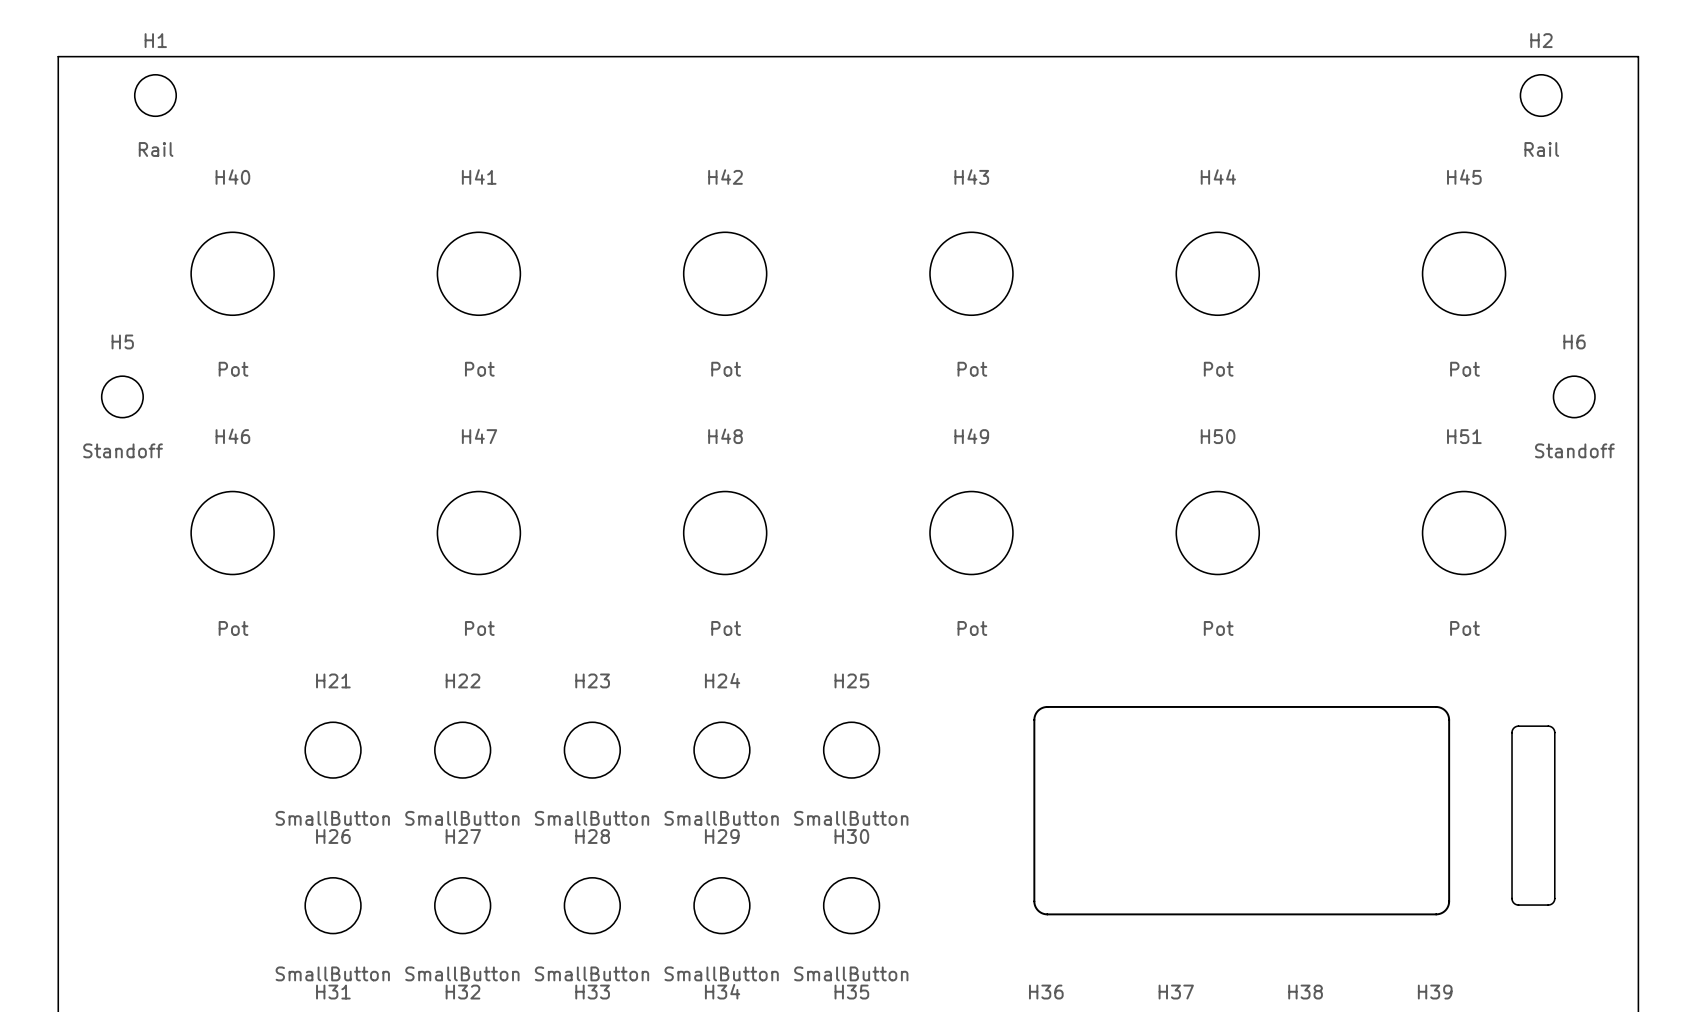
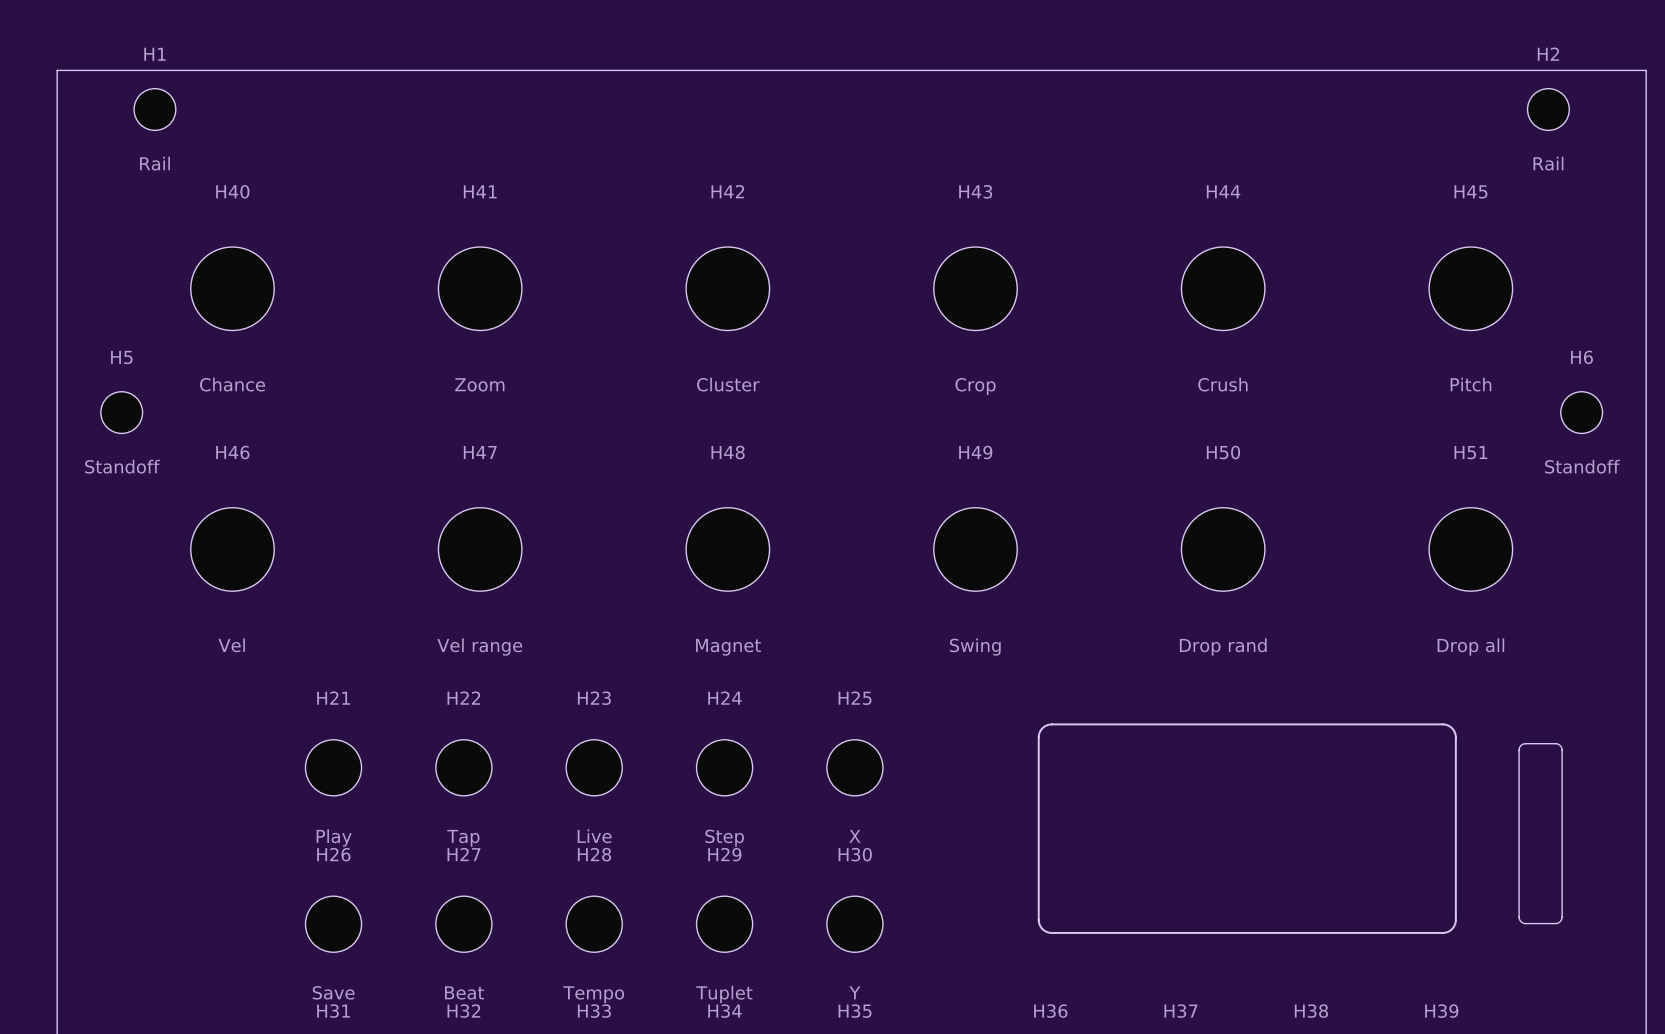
H40 value: Pot (233, 369) -> Chance (232, 384)
H41 value: Pot (479, 369) -> Zoom (479, 384)
H42 value: Pot (726, 369) -> Cluster (728, 384)
H43 value: Pot (972, 369) -> Crop (975, 386)
H44 value: Pot (1218, 369) -> Crush (1222, 384)
H45 value: Pot (1464, 369) -> Pitch (1470, 384)
H46 value: Pot (233, 628) -> Vel (231, 645)
H47 value: Pot (479, 628) -> Vel range (479, 647)
H48 value: Pot (726, 628) -> Magnet (728, 647)
H49 value: Pot (972, 628) -> Swing (975, 647)
H50 value: Pot (1218, 628) -> Drop rand (1223, 647)
H51 value: Pot (1464, 628) -> Drop all (1470, 647)
H21 value: SmallButton (332, 818) -> Play (334, 837)
H22 value: SmallButton (462, 818) -> Tap (463, 838)
H23 value: SmallButton (592, 818) -> Live (594, 836)
H24 value: SmallButton (721, 818) -> Step (724, 838)
H25 value: SmallButton (851, 818) -> X (854, 836)
H26 value: SmallButton (332, 973) -> Save (333, 992)
H27 value: SmallButton (462, 973) -> Beat (464, 992)
H28 value: SmallButton (592, 973) -> Tempo (593, 994)
H29 value: SmallButton (721, 973) -> Tuplet (724, 994)
H30 value: SmallButton (851, 973) -> Y (854, 992)

